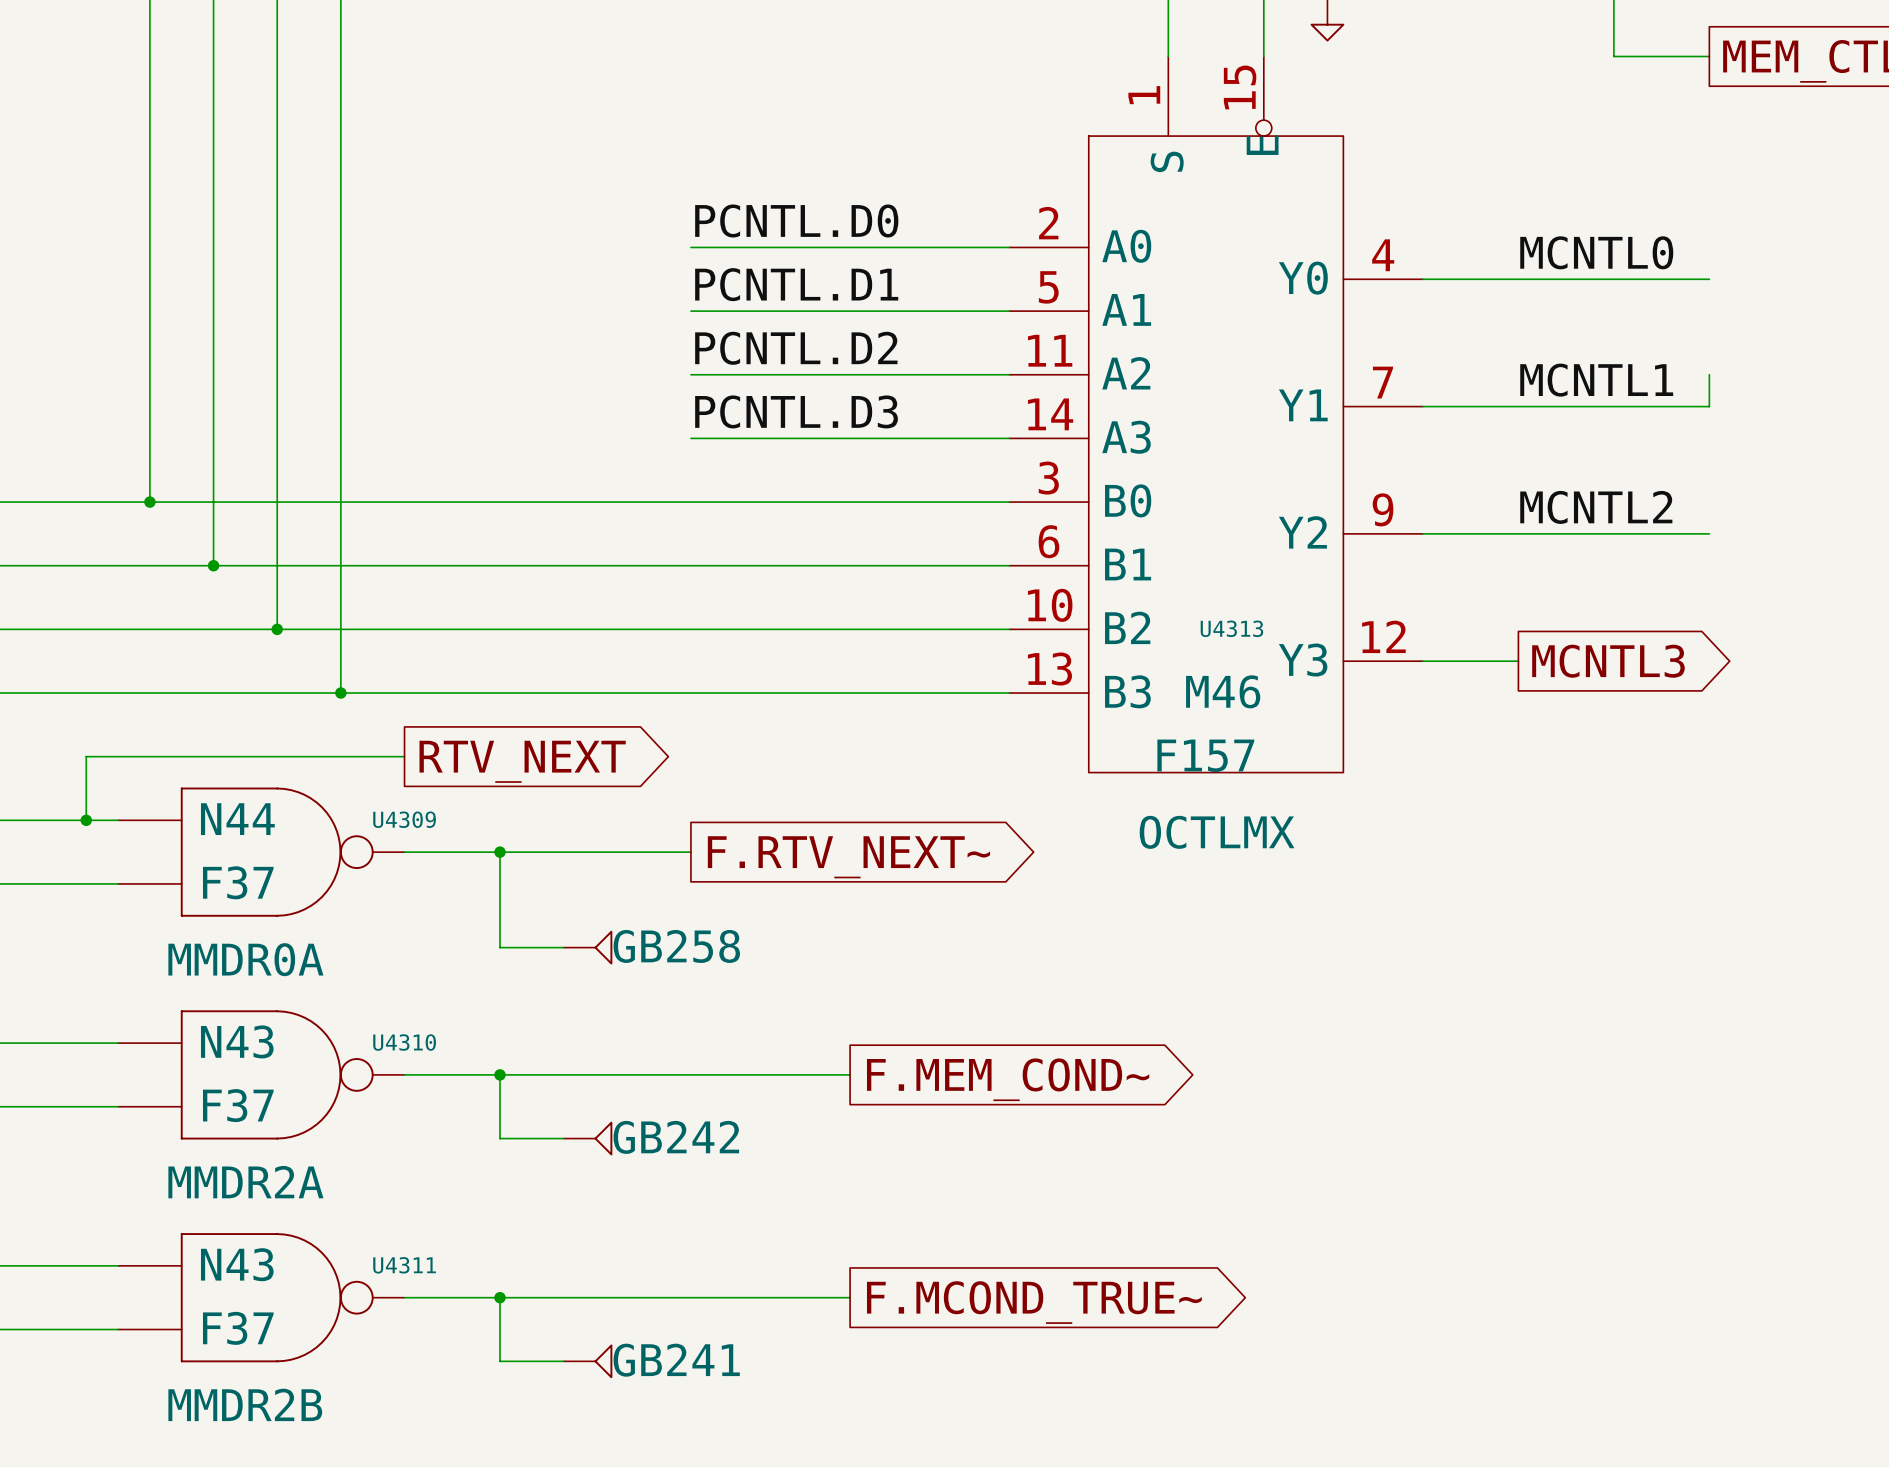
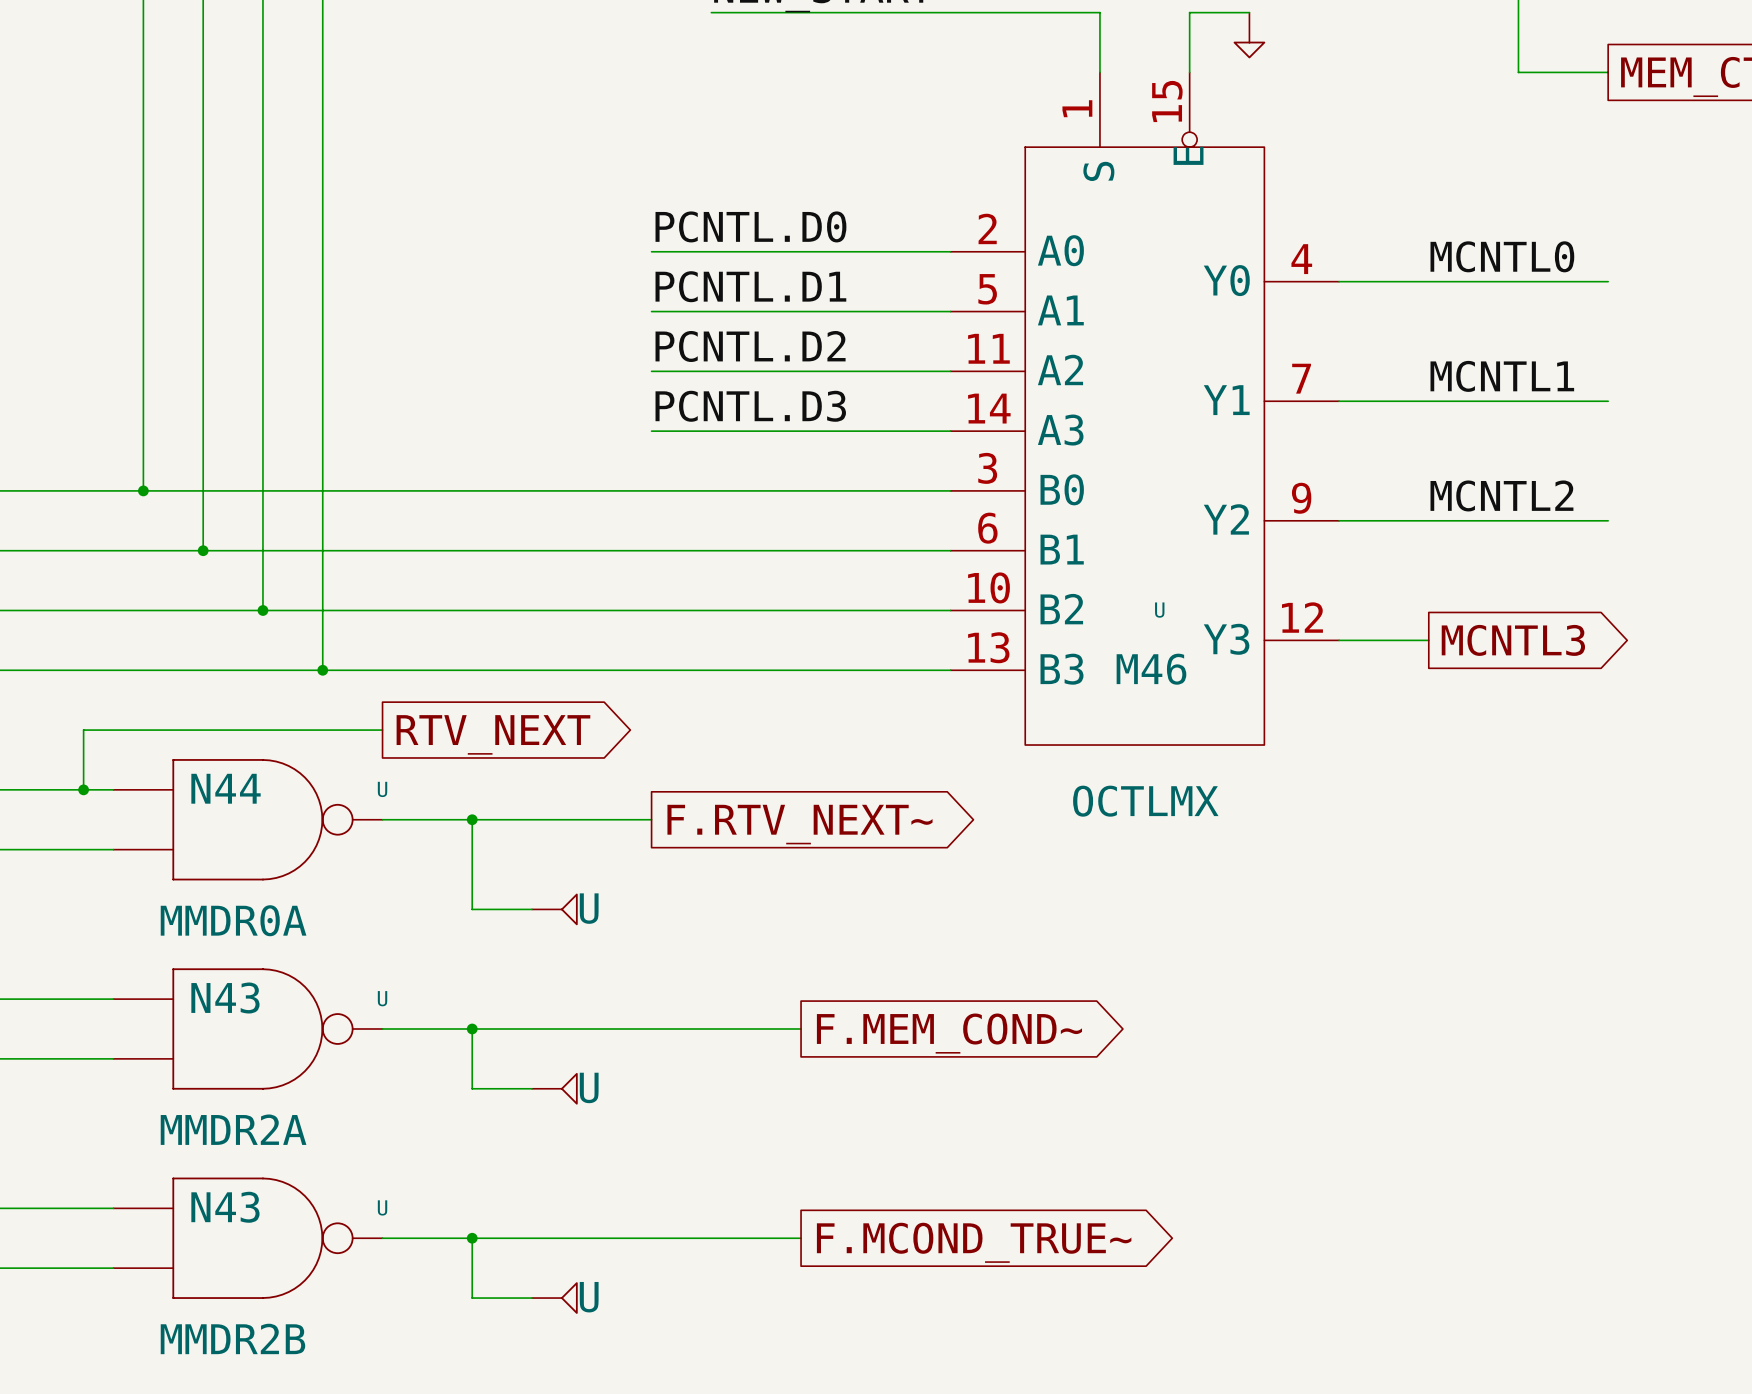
wire: (1709, 374) (1709, 406) -> none
U4313 name: U4313 (1231, 628) -> U (1159, 610)
U4313 value: F157 (1205, 755) -> none
U4309 name: U4309 (404, 819) -> U (382, 789)
U4309 value: F37 (238, 882) -> none
GB258 name: GB258 (676, 946) -> U (589, 908)
U4310 name: U4310 (404, 1042) -> U (382, 998)
U4310 value: F37 (238, 1105) -> none
GB242 name: GB242 (676, 1137) -> U (589, 1087)
U4311 name: U4311 (404, 1265) -> U (382, 1207)
U4311 value: F37 (238, 1328) -> none
GB241 name: GB241 (676, 1360) -> U (589, 1297)

